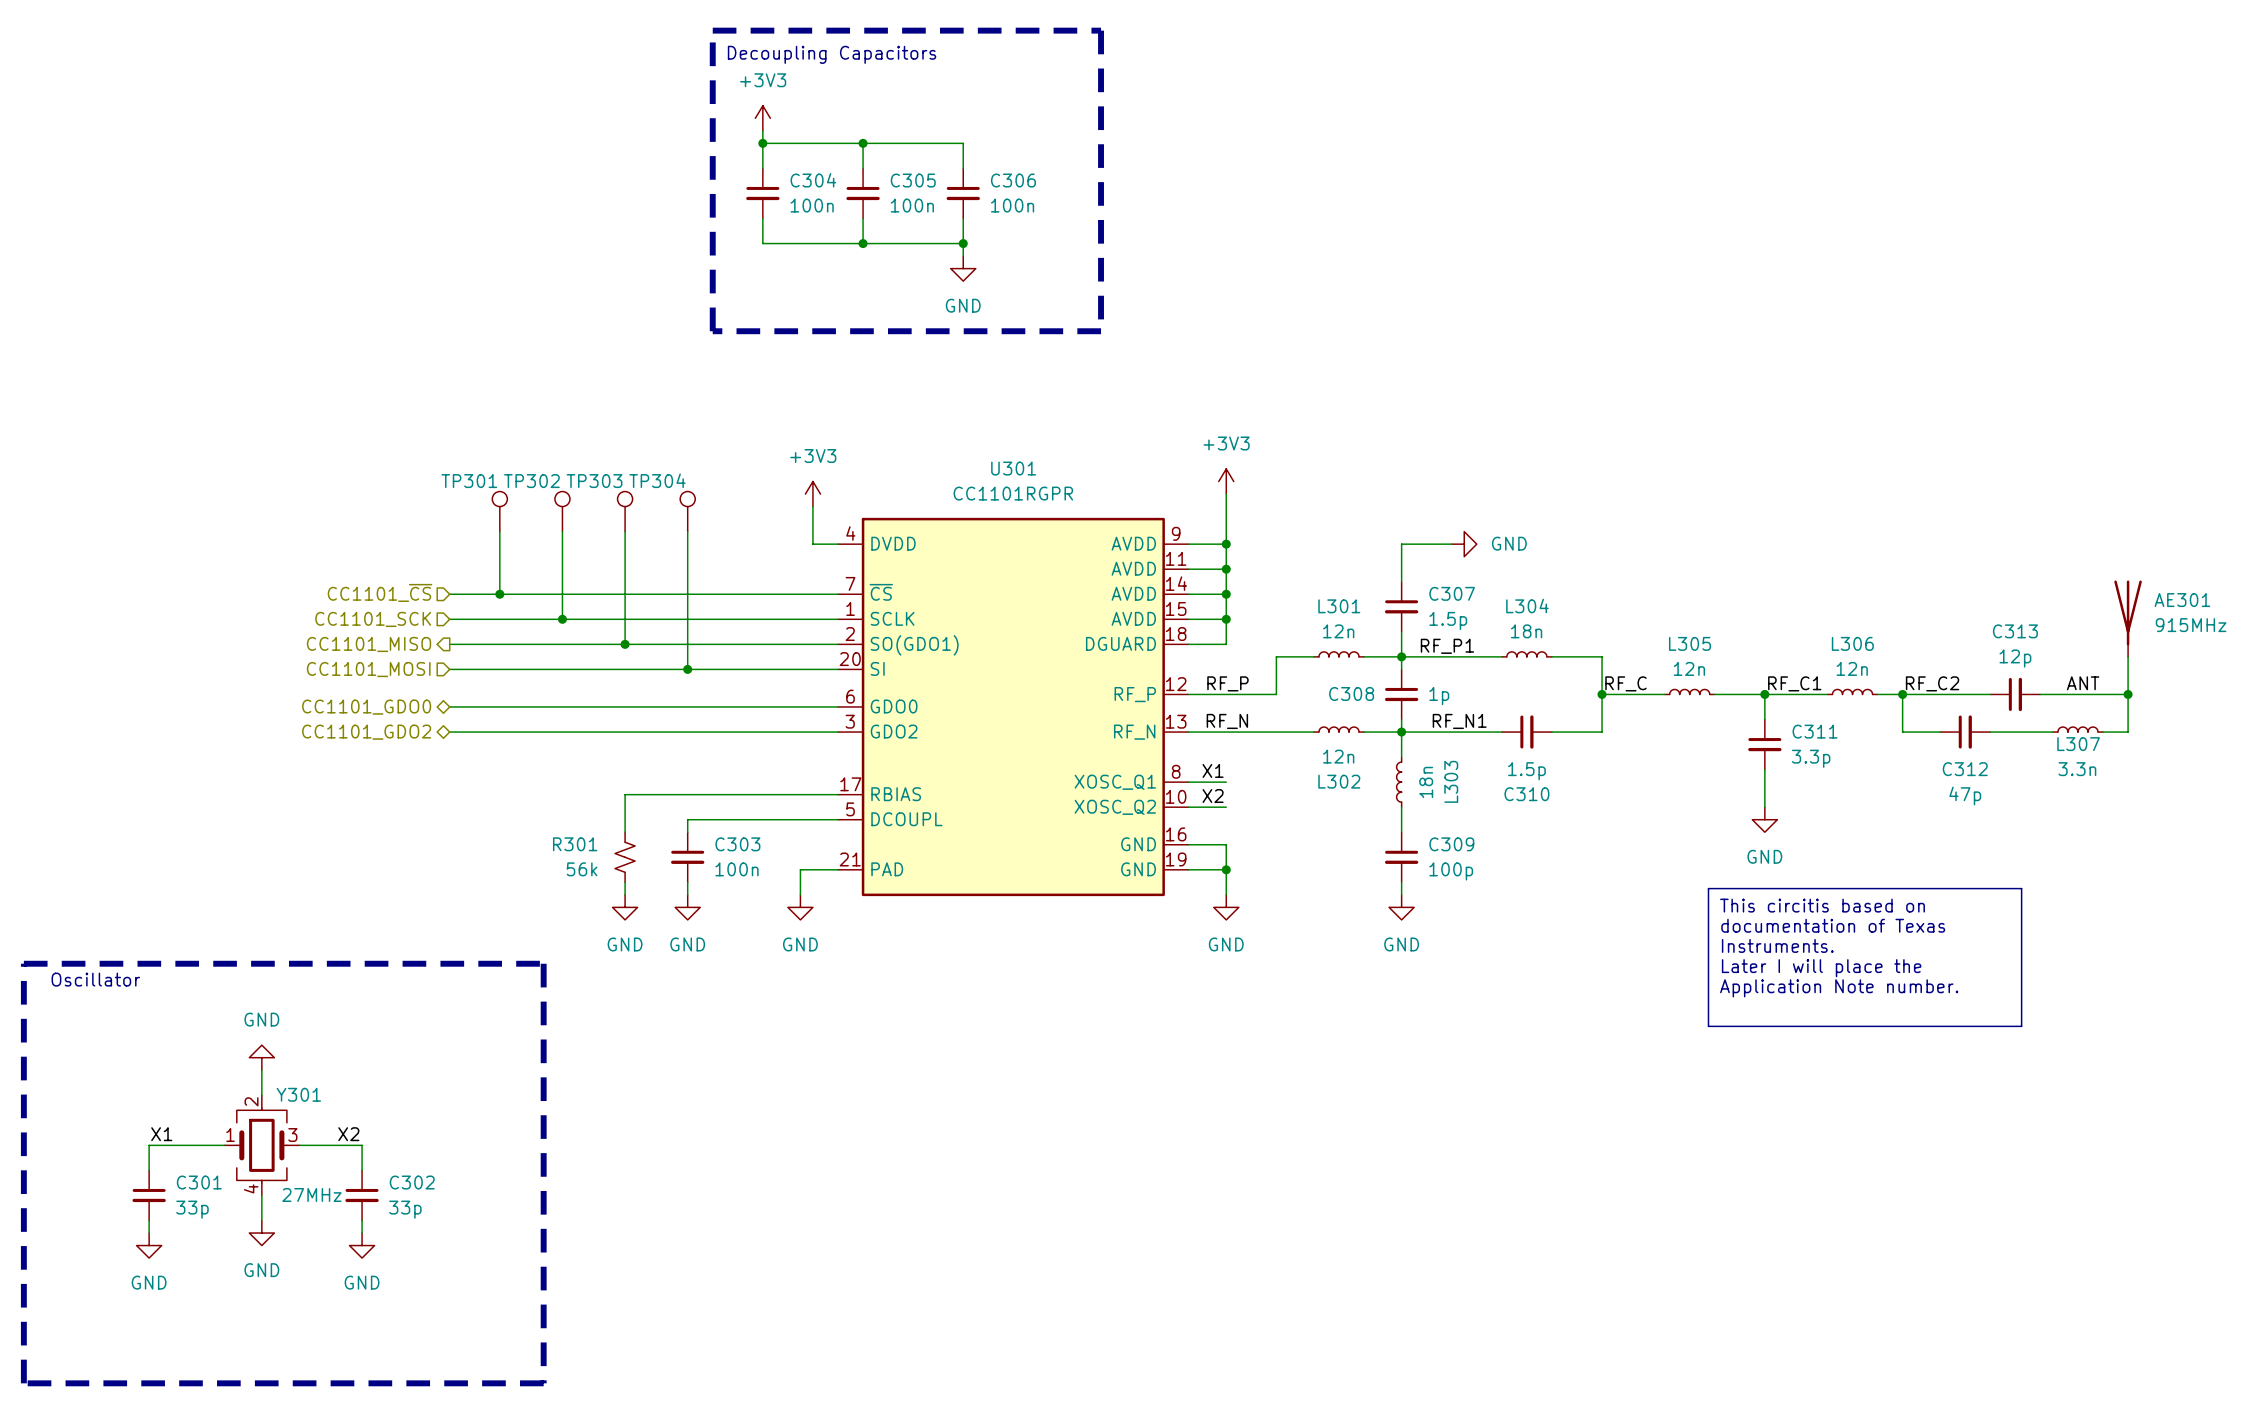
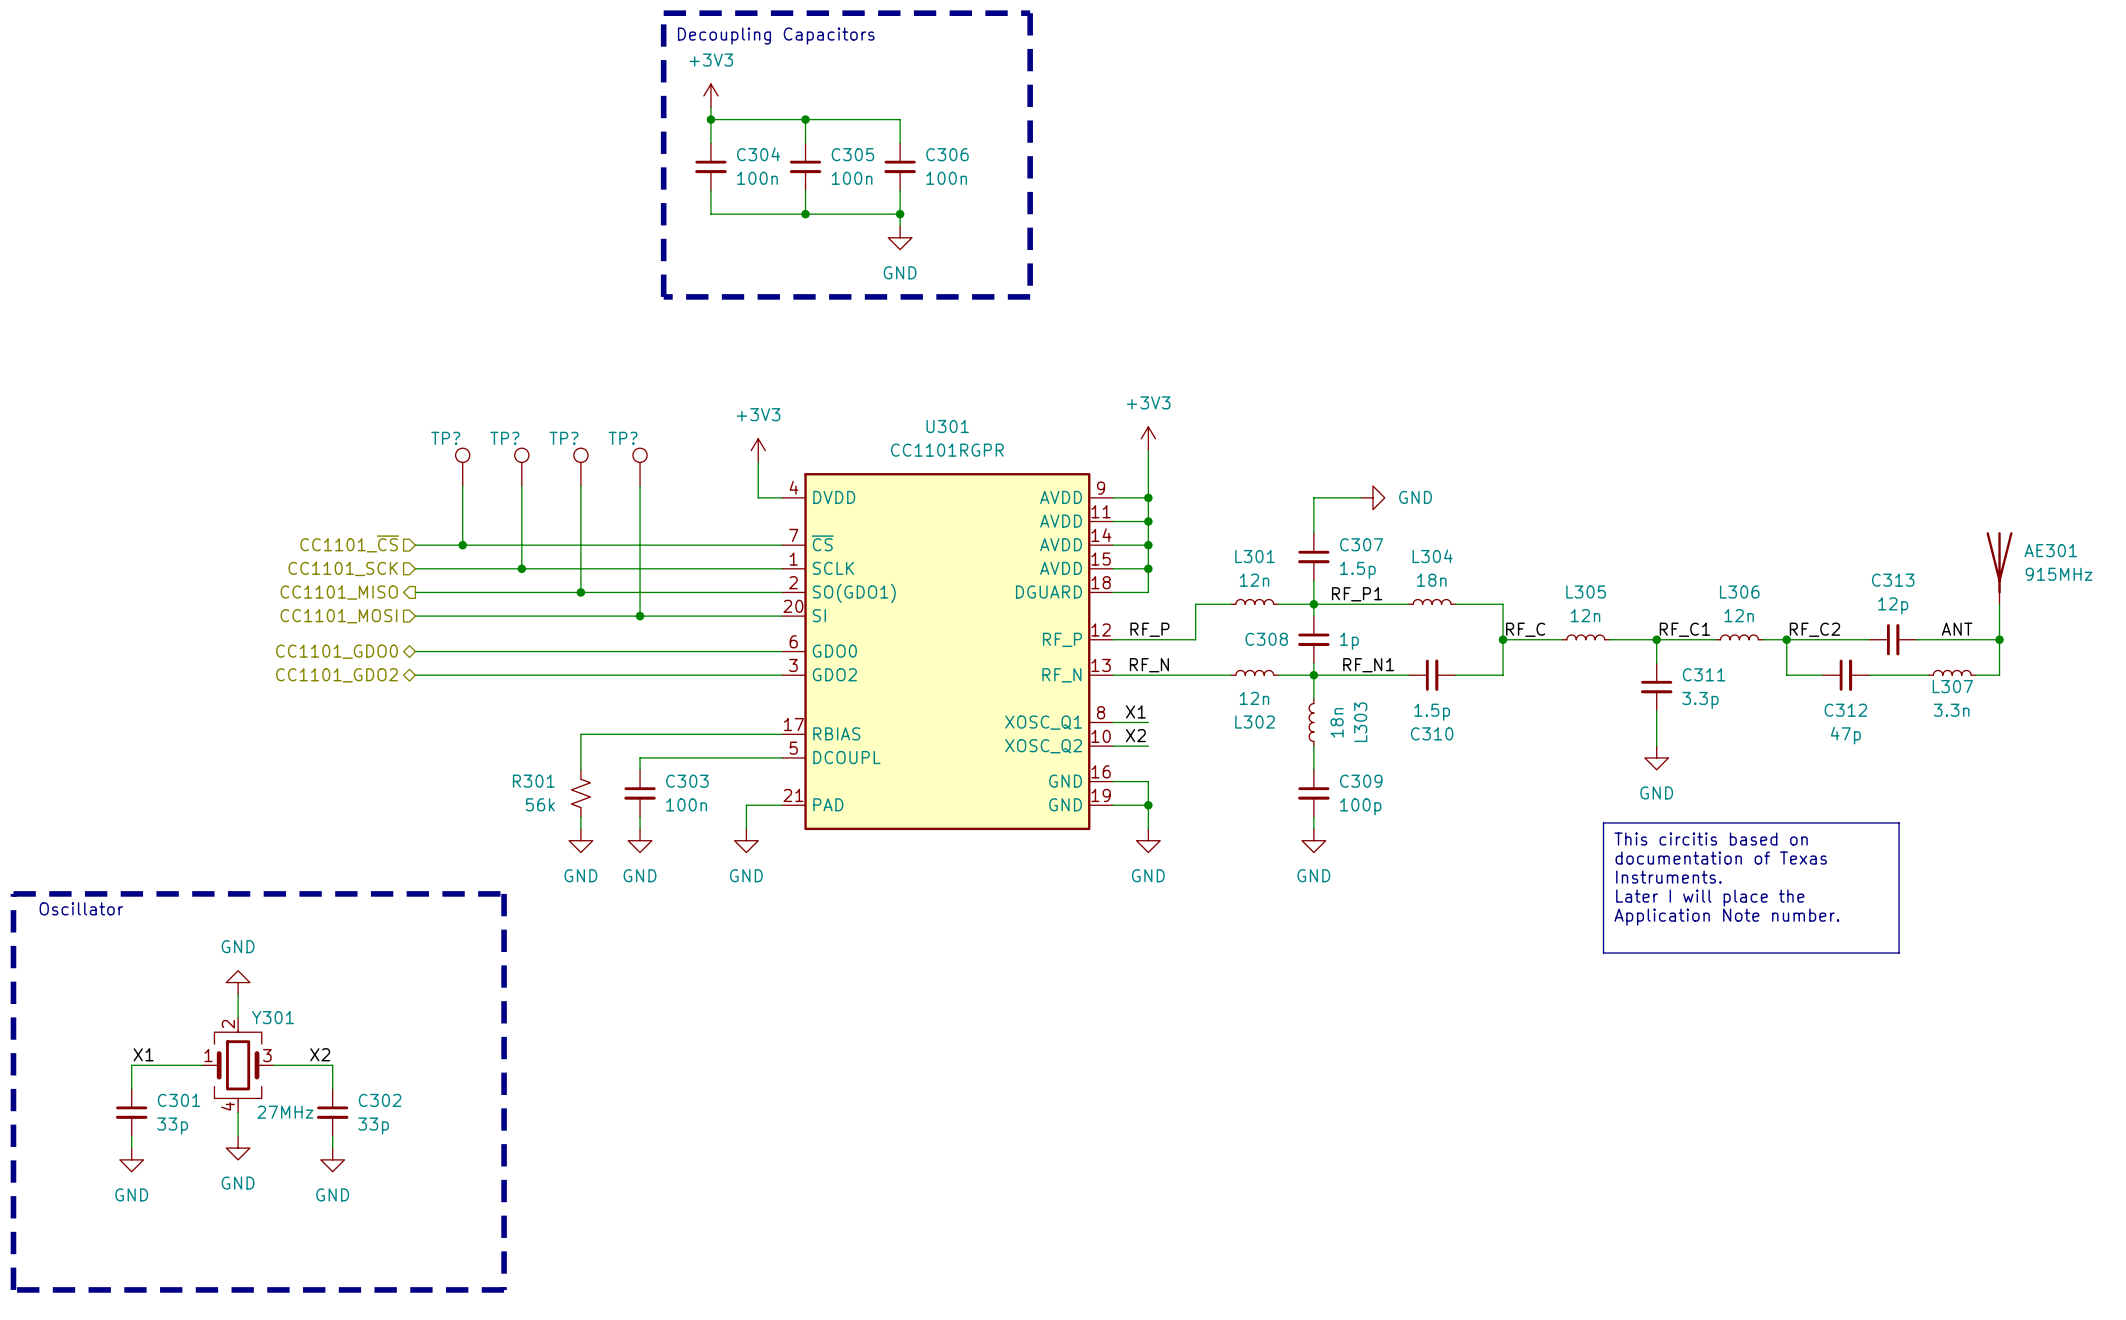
TP304 name: TP304 (657, 480) -> TP? (623, 438)
TP301 name: TP301 (469, 481) -> TP? (445, 438)
TP302 name: TP302 (531, 481) -> TP? (504, 438)
TP303 name: TP303 (594, 481) -> TP? (563, 438)

